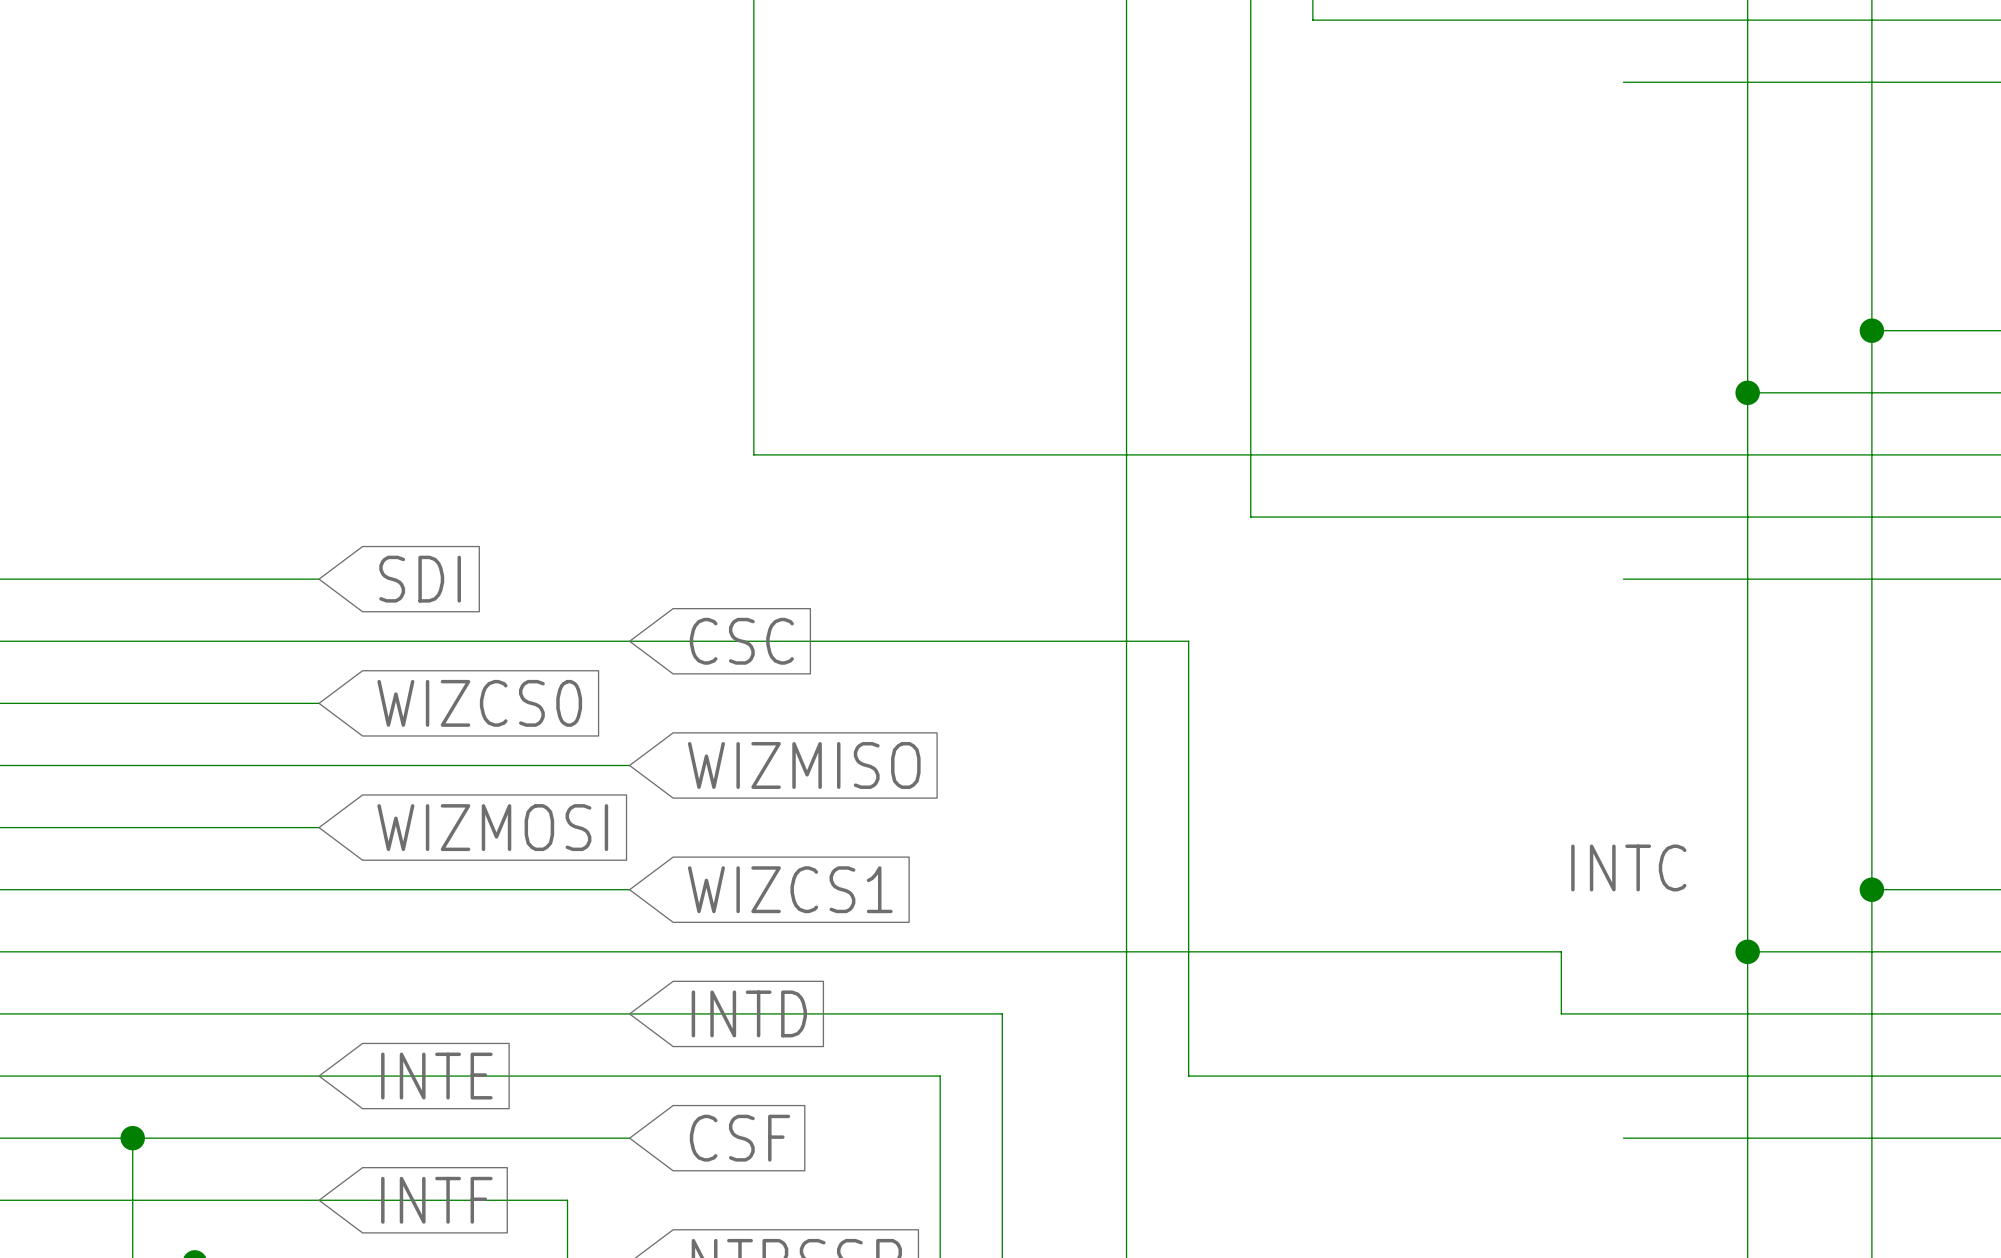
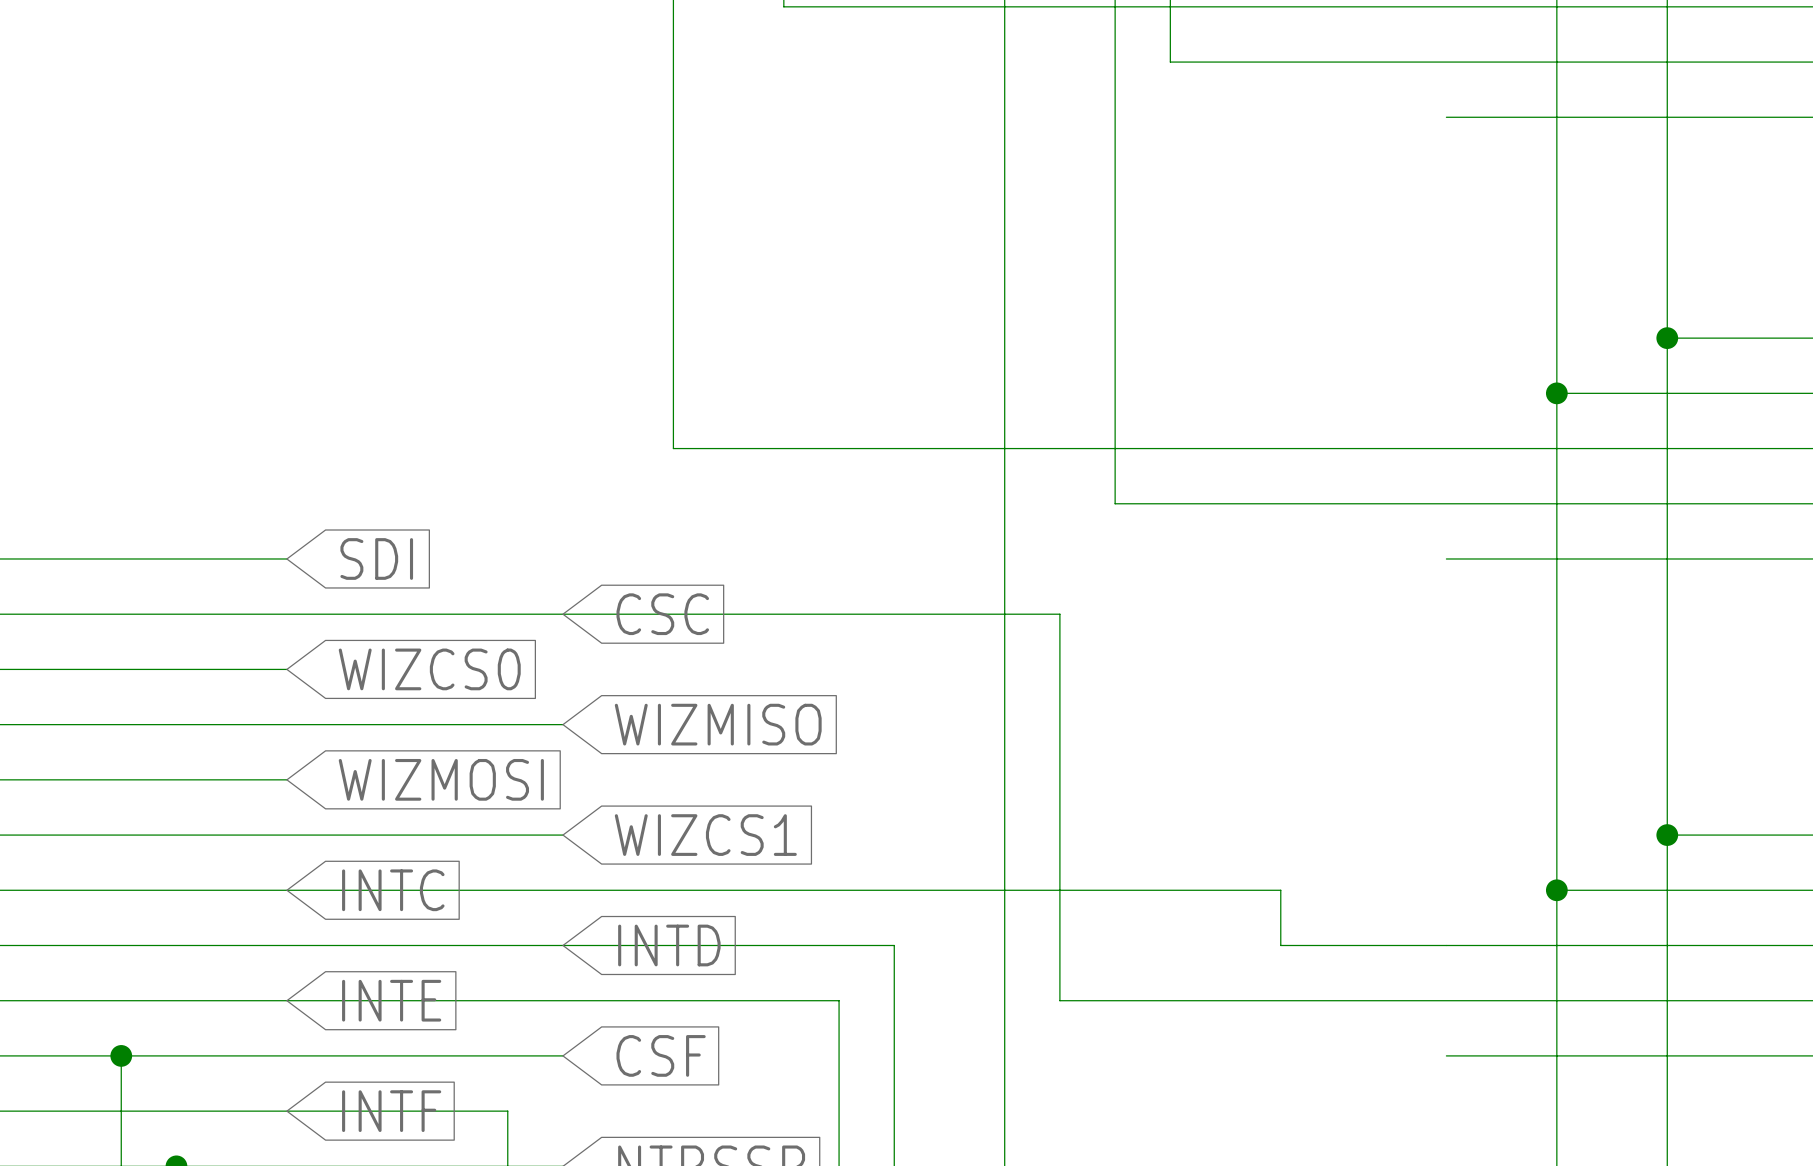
label: INTC (1628, 867) -> none
global label: none -> INTC (393, 890)
wire: (1437, 951) (1561, 951) (1561, 1013) -> (1280, 890) (1280, 945) (1391, 945)

